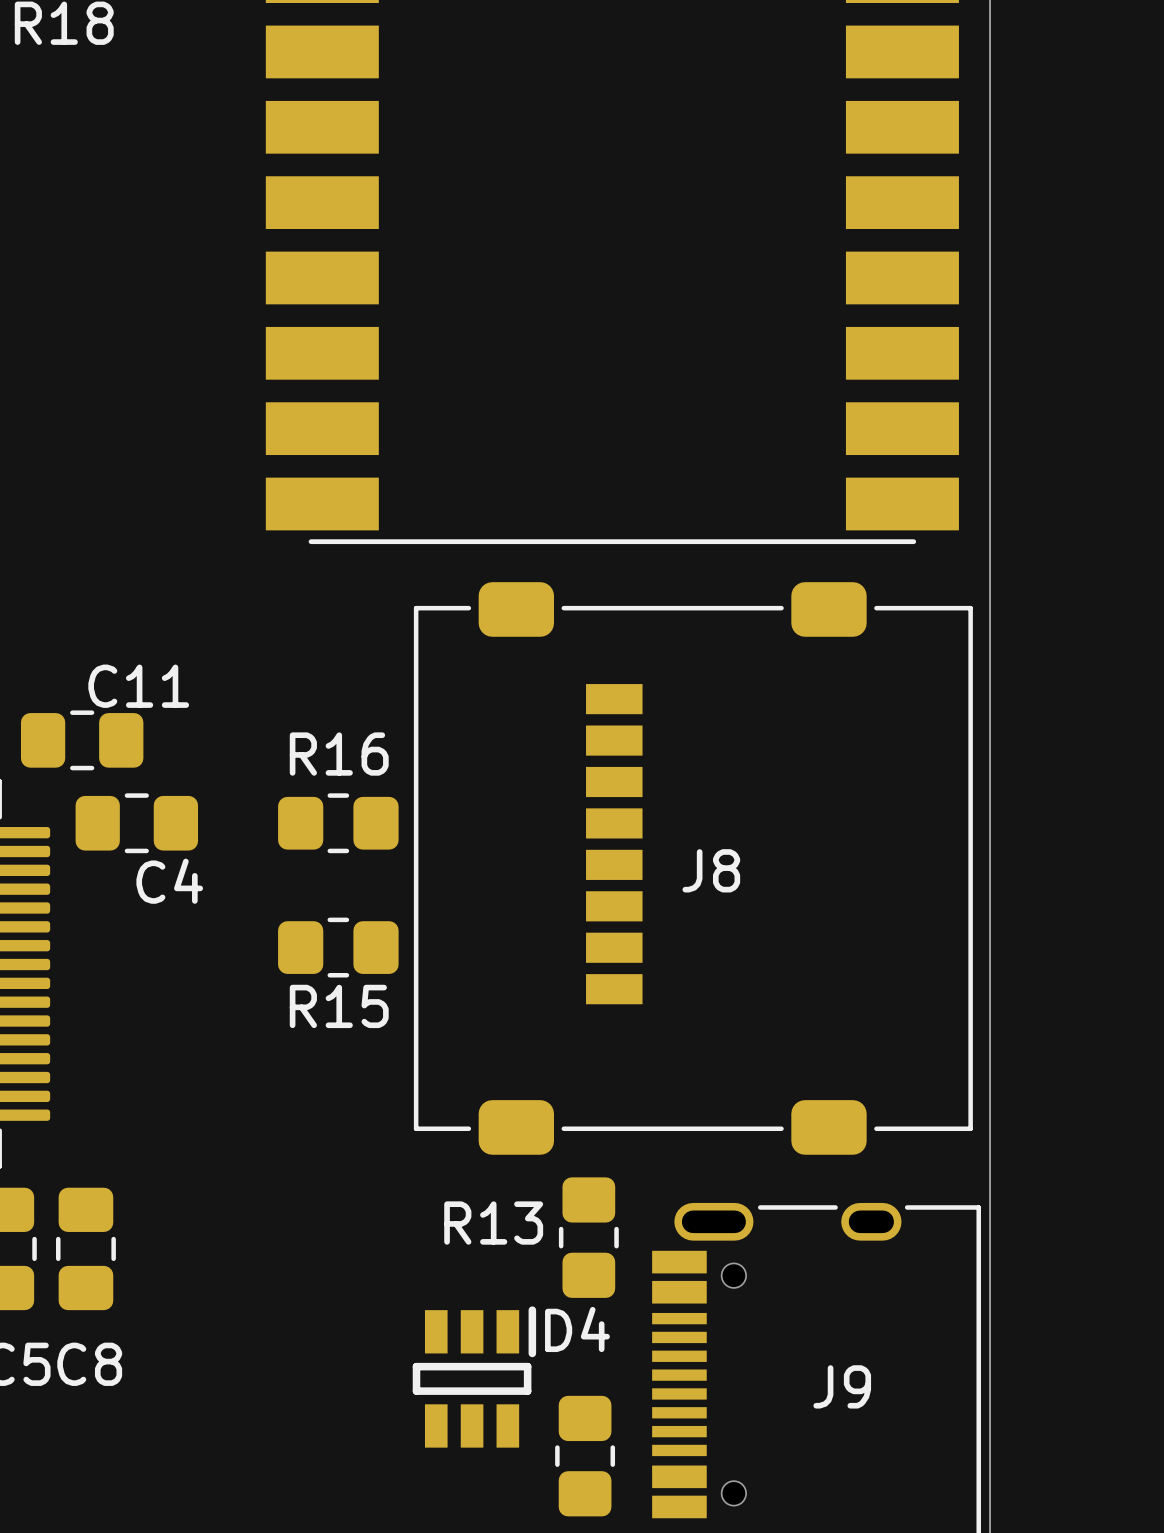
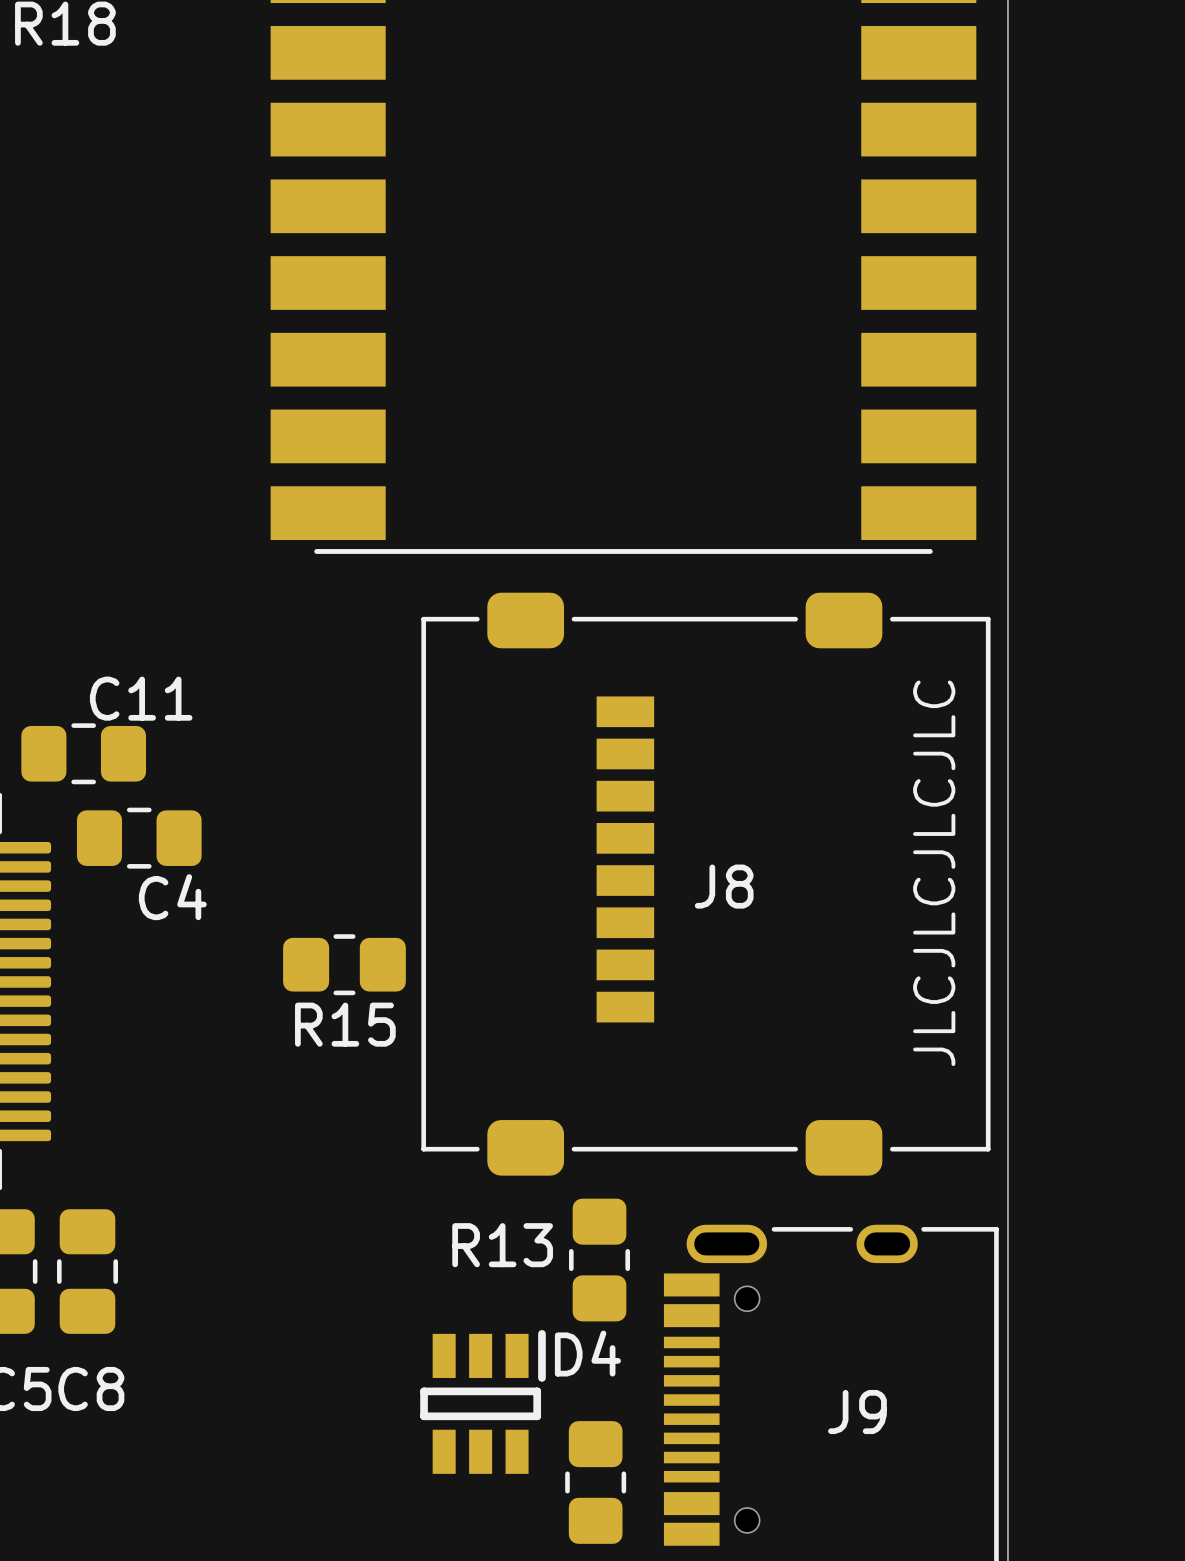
R16: (338, 823) -> none
text: none -> JLCJLCJLCJLC (934, 873)

